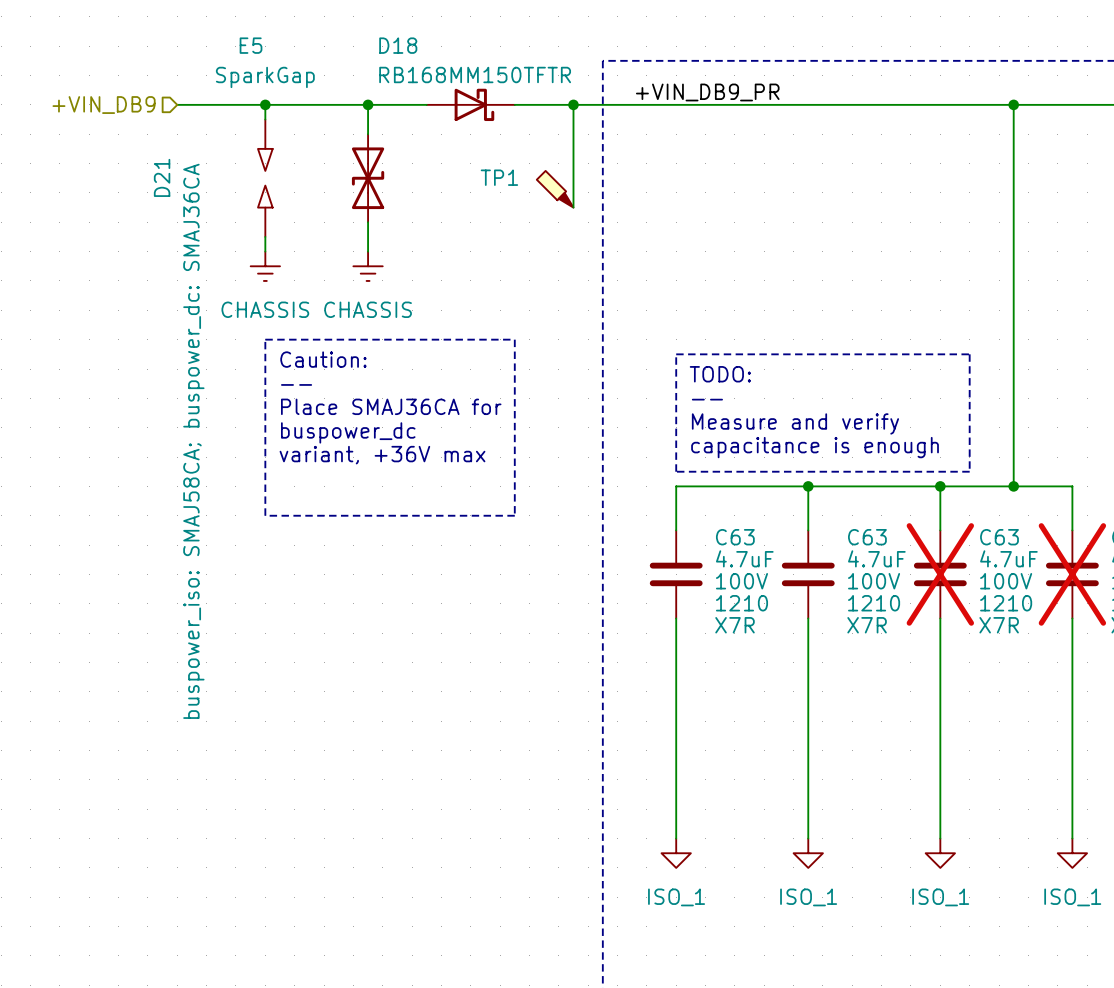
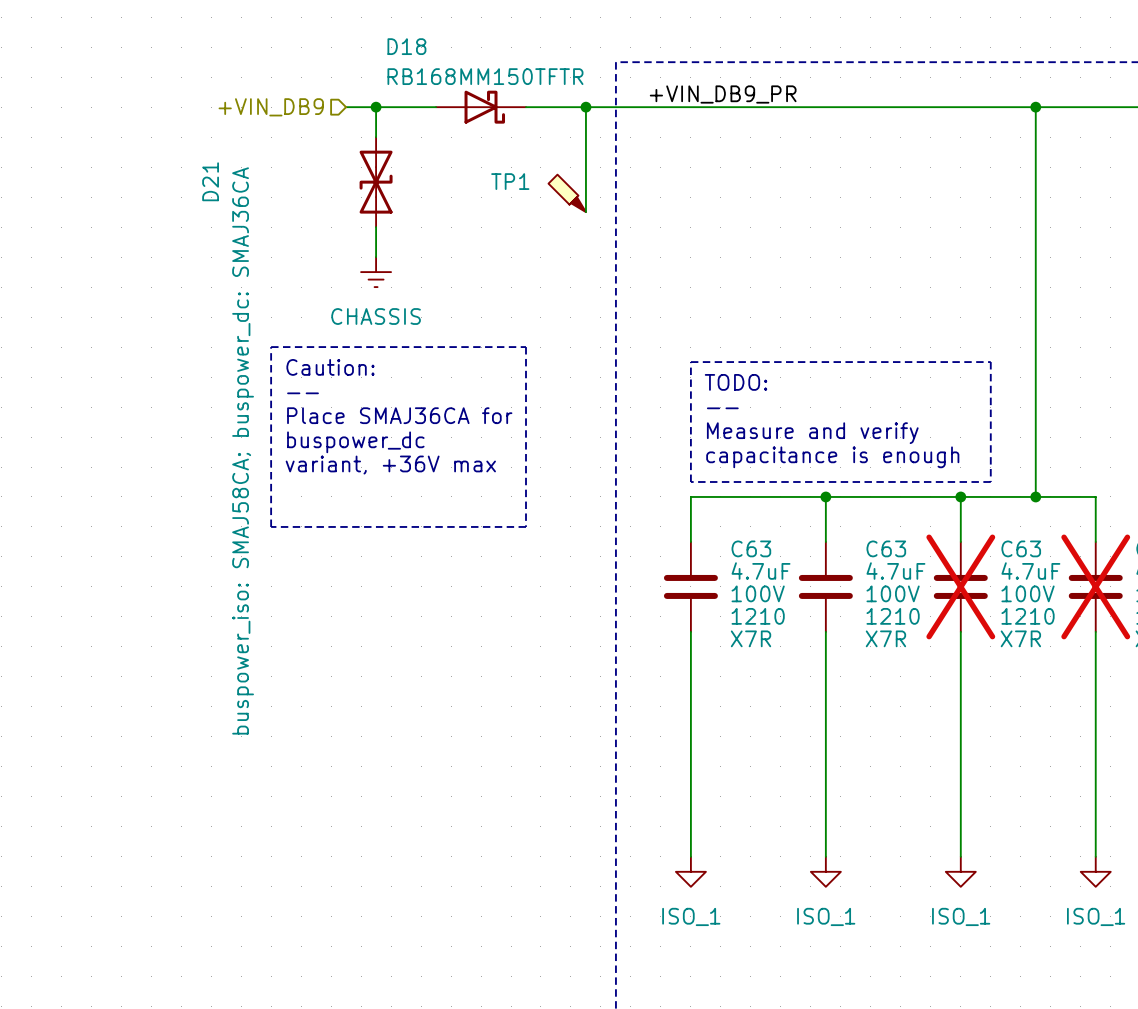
wire: (177, 104) (338, 104) -> none
wire: (265, 104) (265, 119) -> none
junction: (265, 104) -> none
hierarchical label position: +VIN_DB9 (104, 105) -> +VIN_DB9 (271, 107)
D21 name position: D21 (162, 177) -> D21 (210, 181)
E5: SparkGap (265, 178) -> none
wire: (265, 236) (265, 251) -> none
power symbol: CHASSIS (265, 266) -> none
D21 value position: buspower_iso: SMAJ58CA; buspower_dc: SMAJ36CA (193, 441) -> buspower_iso: SMAJ58CA; buspower_dc: SMAJ36CA (243, 450)

